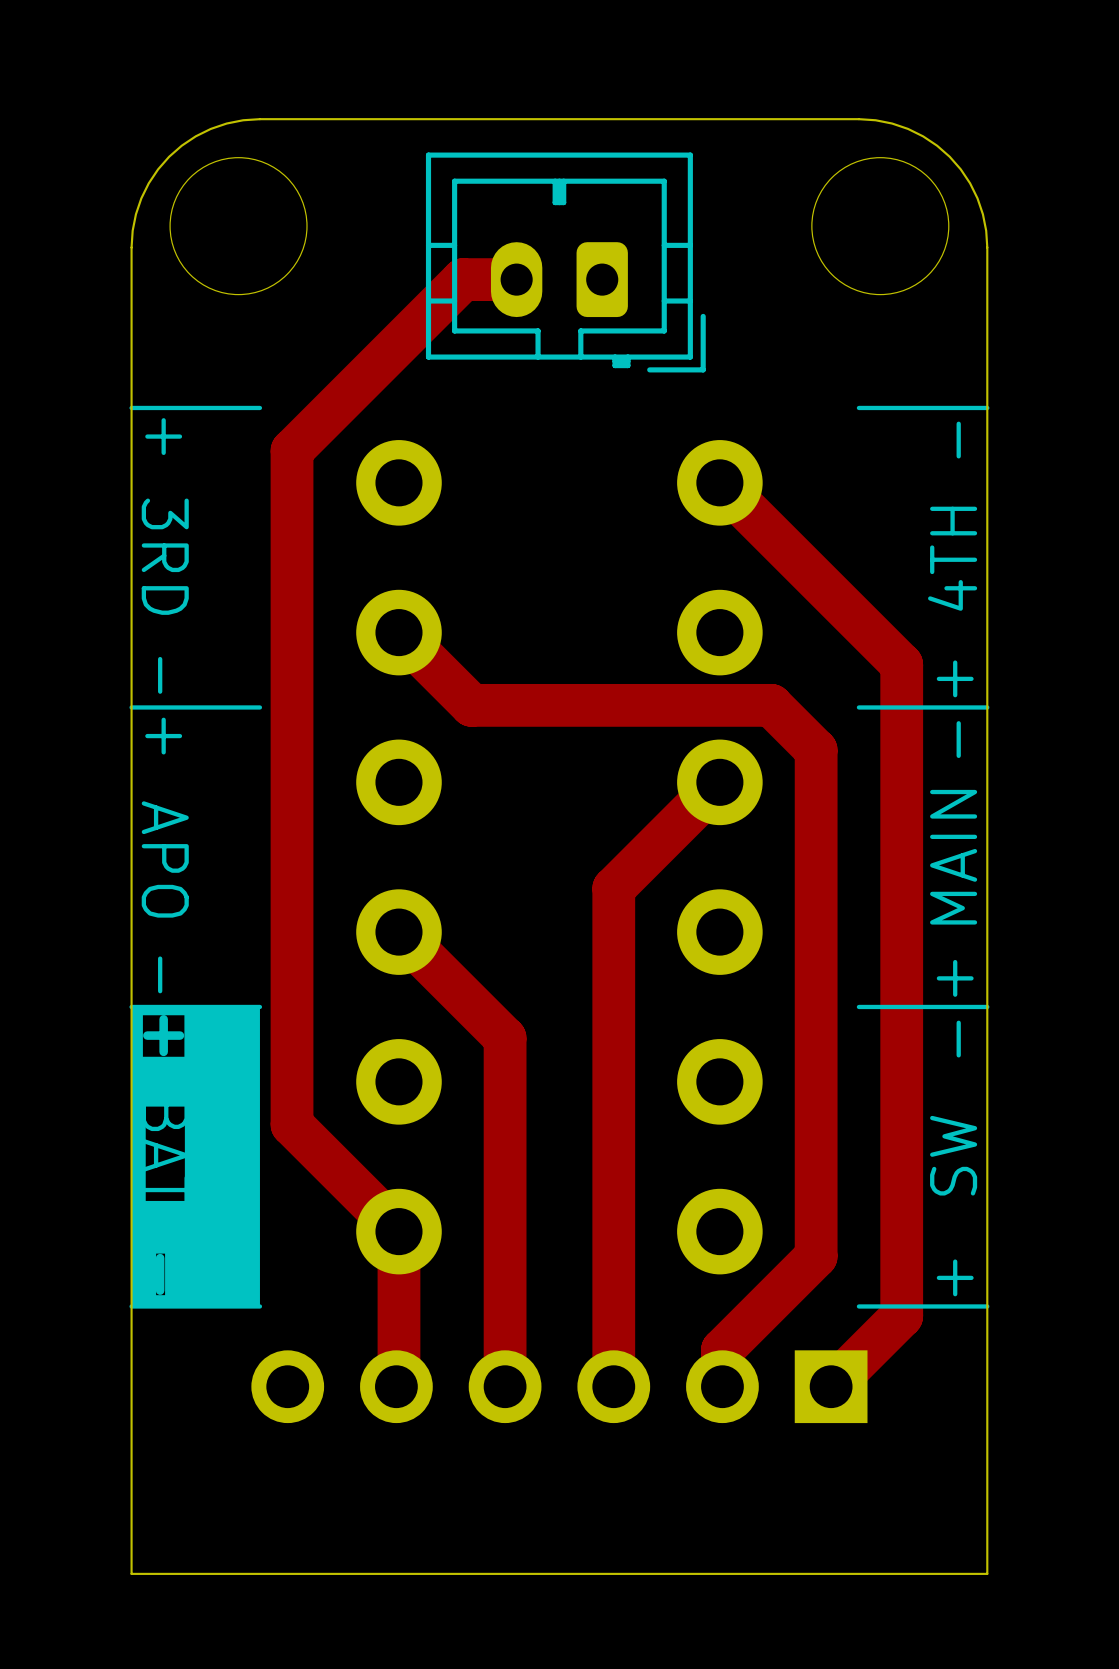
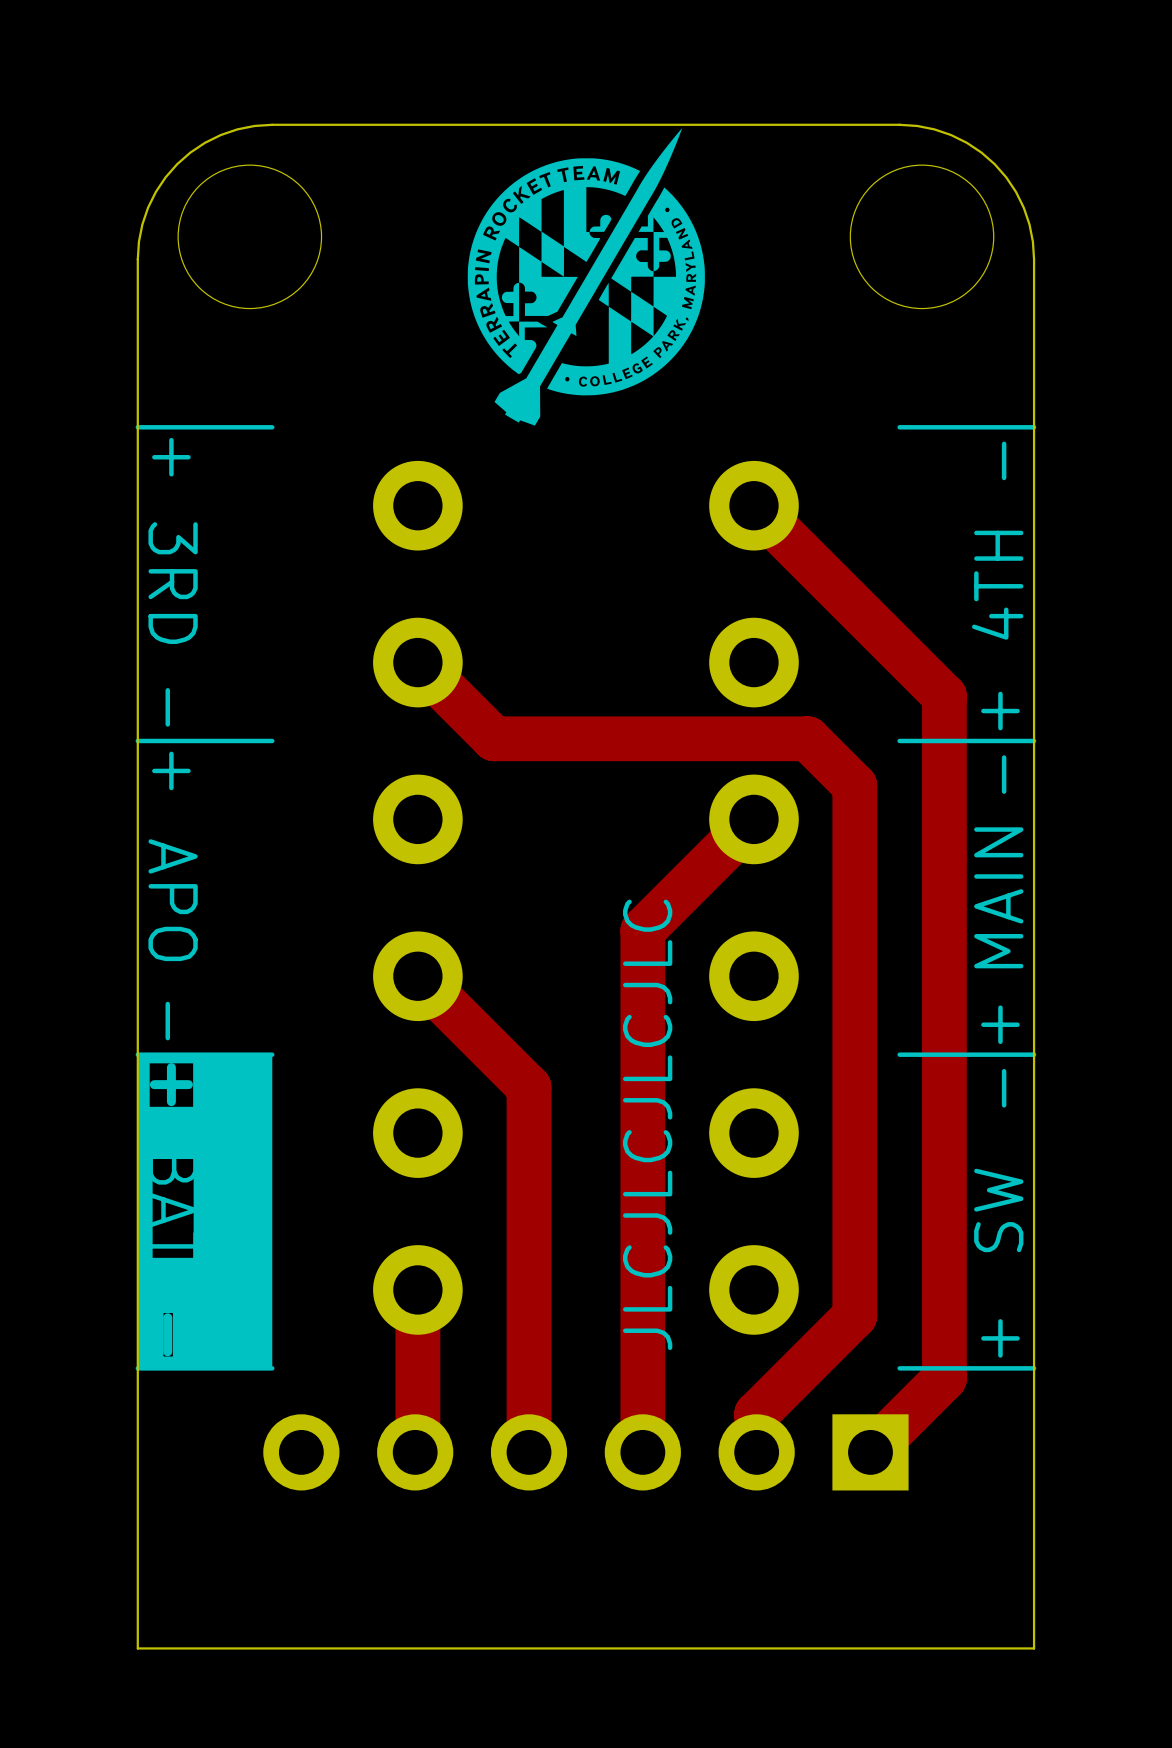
drawing: none -> [467, 128, 705, 426]
part: (565, 262) -> none
track: (516, 279) (463, 279) (292, 450) (292, 1124) (398, 1231) -> none
text: none -> JLCJLCJLCJLC (647, 1124)

